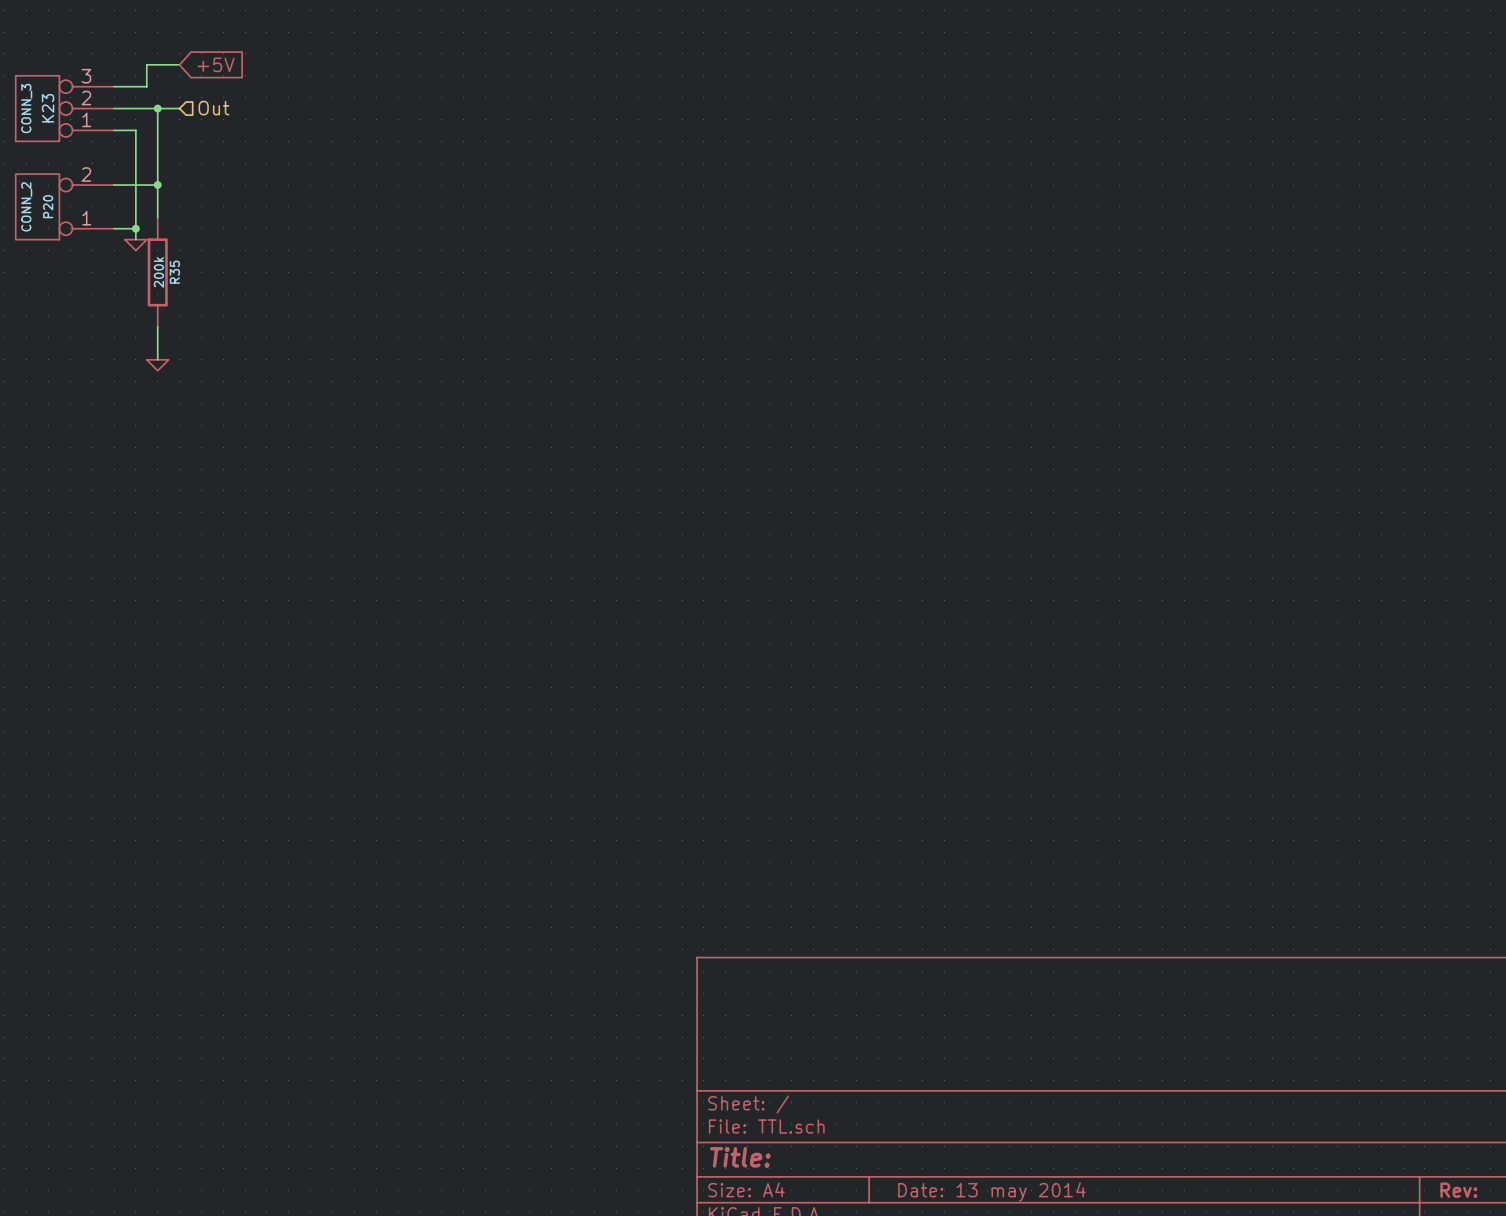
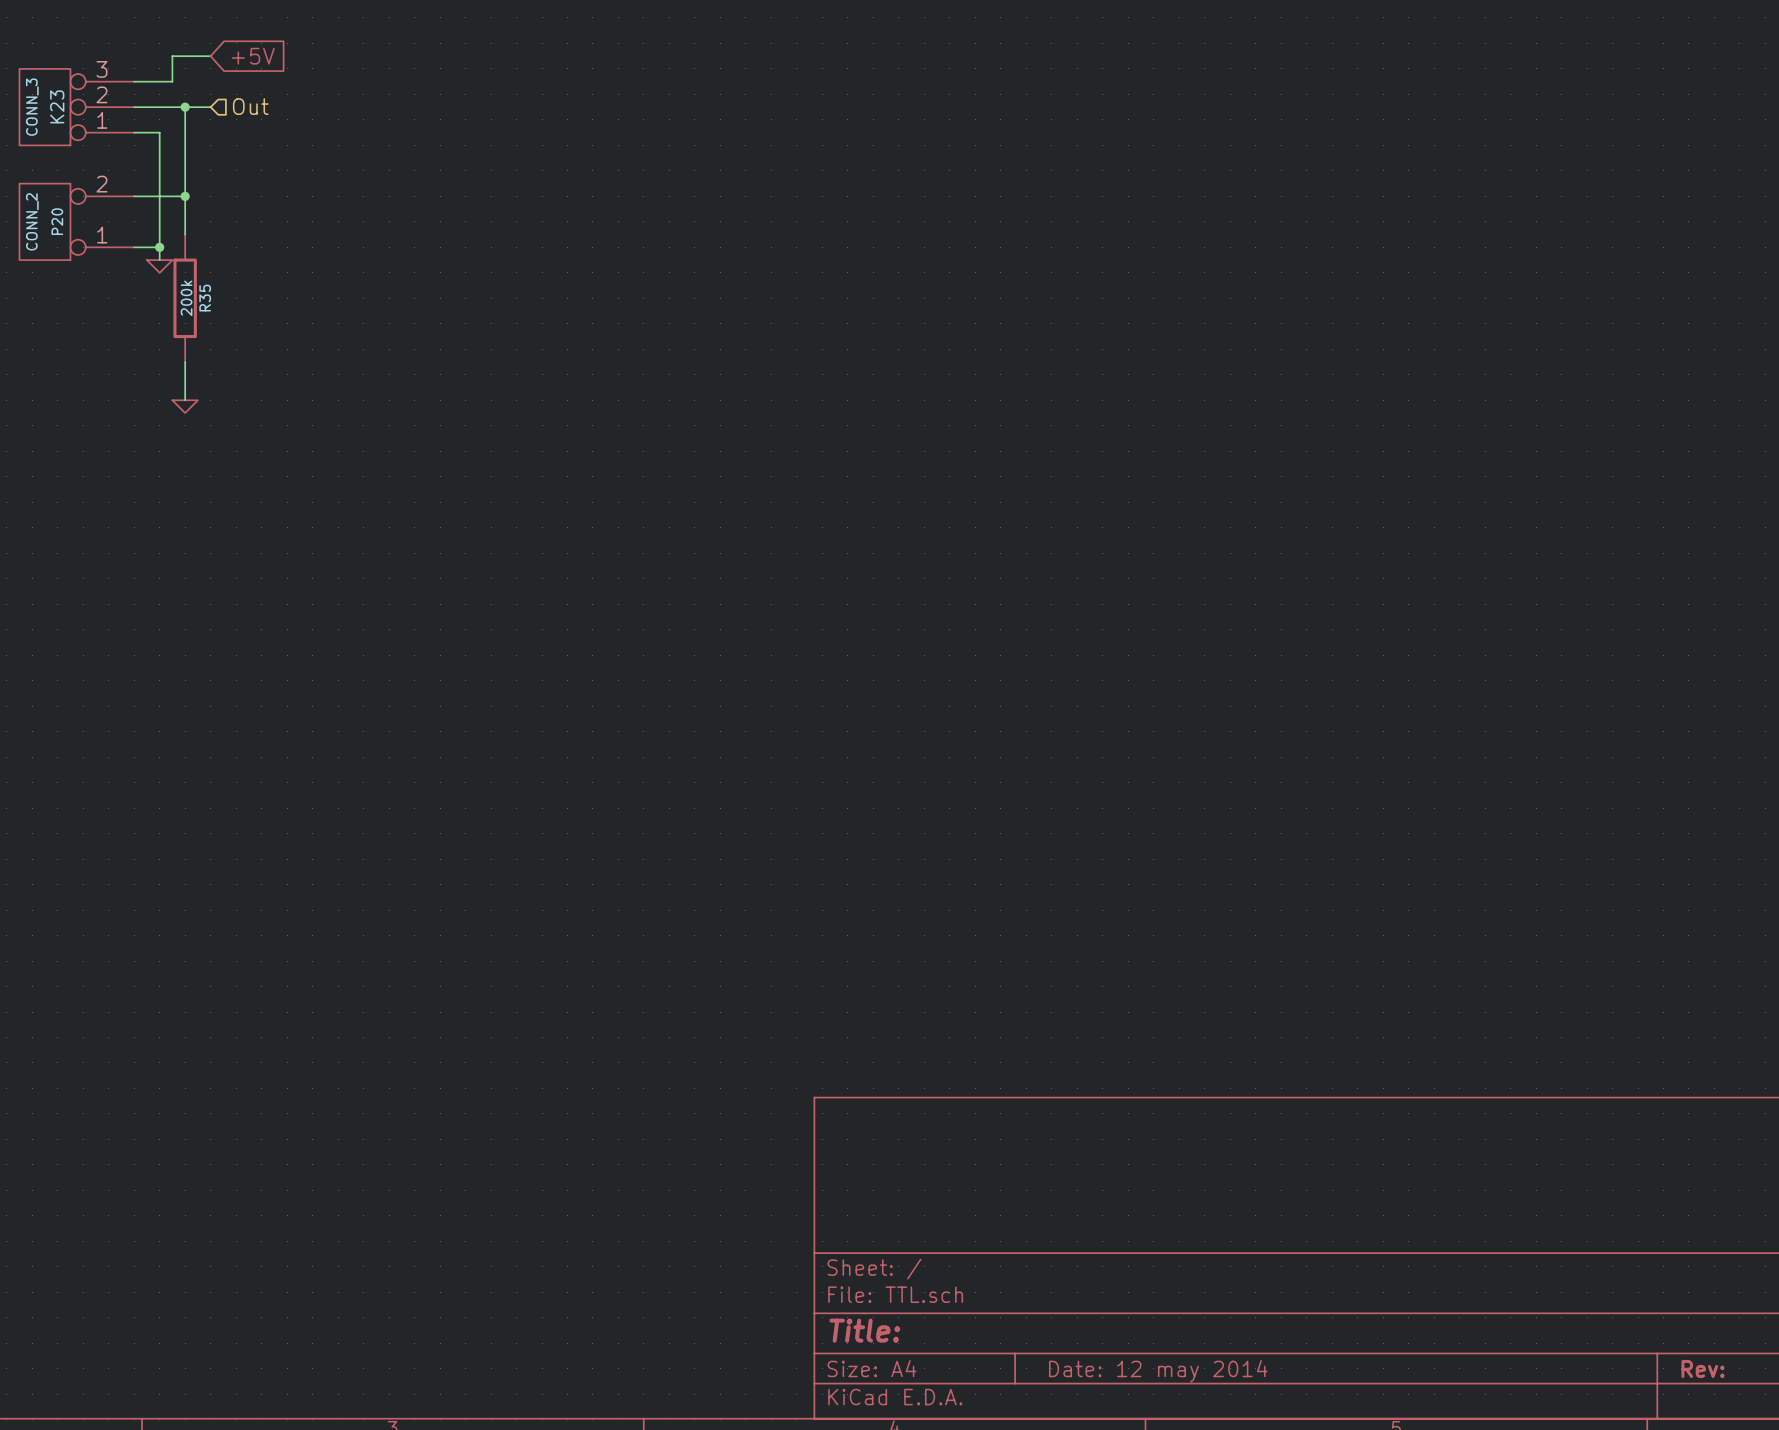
title block: Date: 13 may 2014 (991, 1192) -> Date: 12 may 2014 (1158, 1371)

